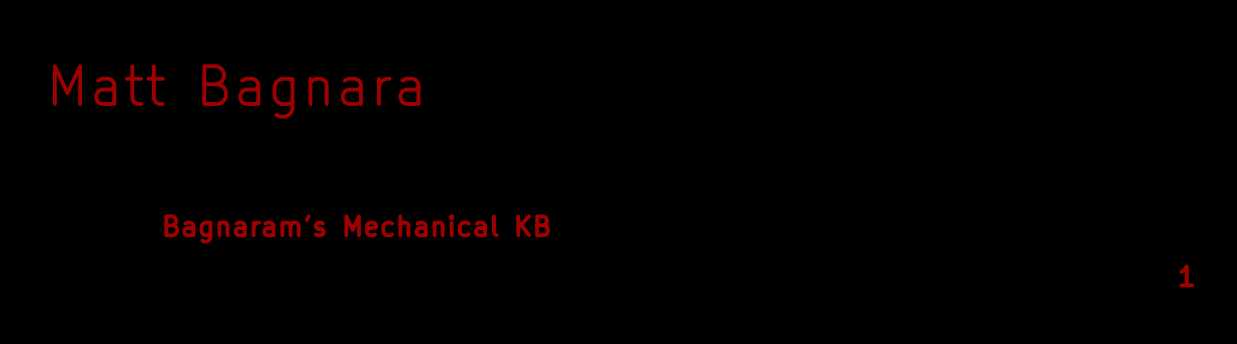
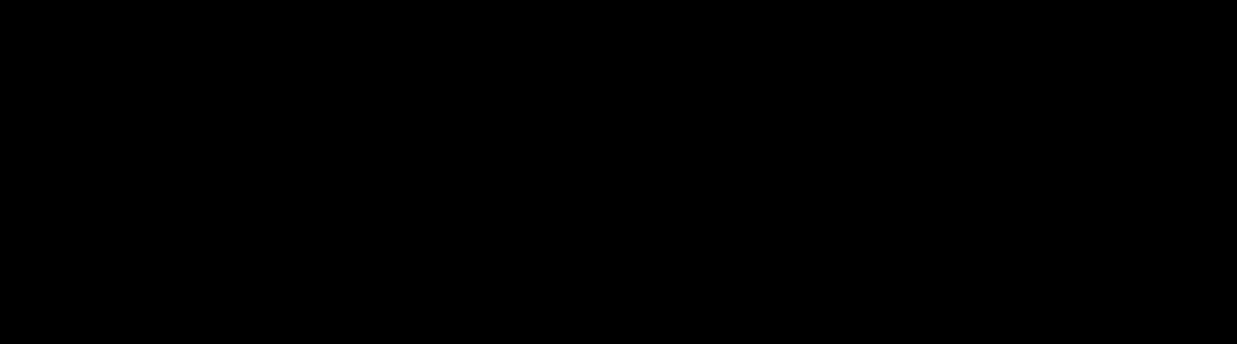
text: Matt Bagnara (236, 91) -> none
text: Bagnaram's Mechanical KB (357, 228) -> none
text: 1 (1186, 275) -> none

